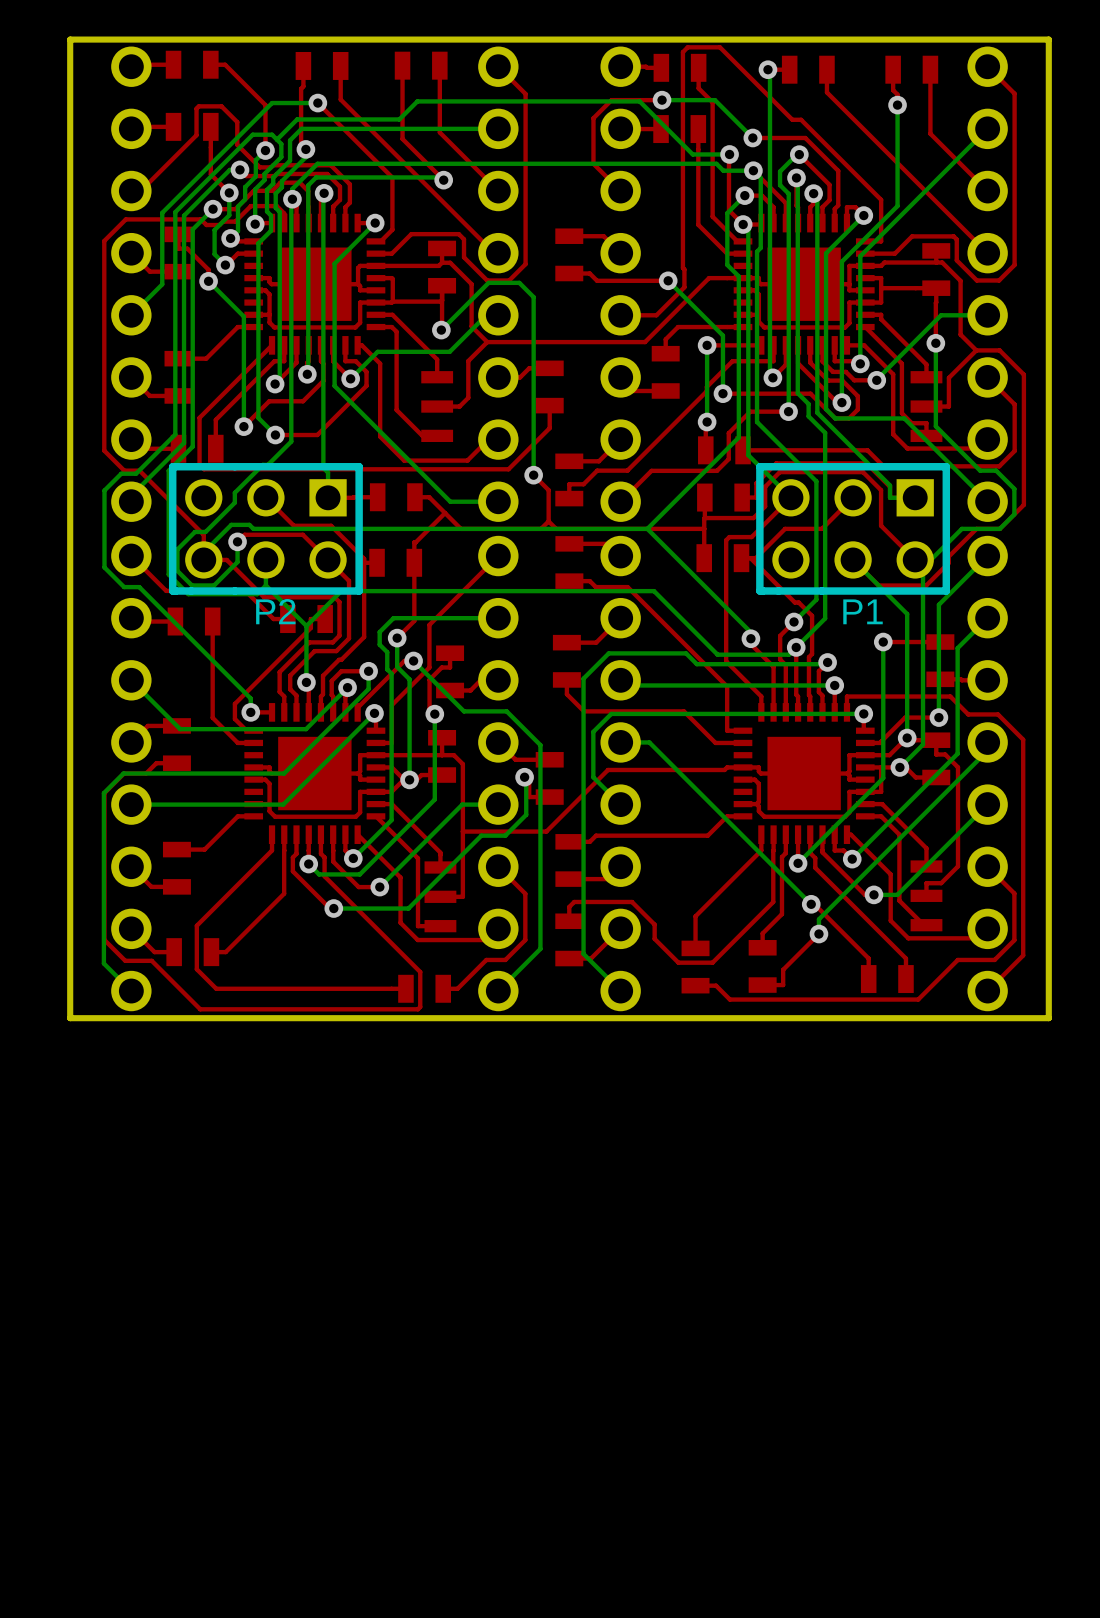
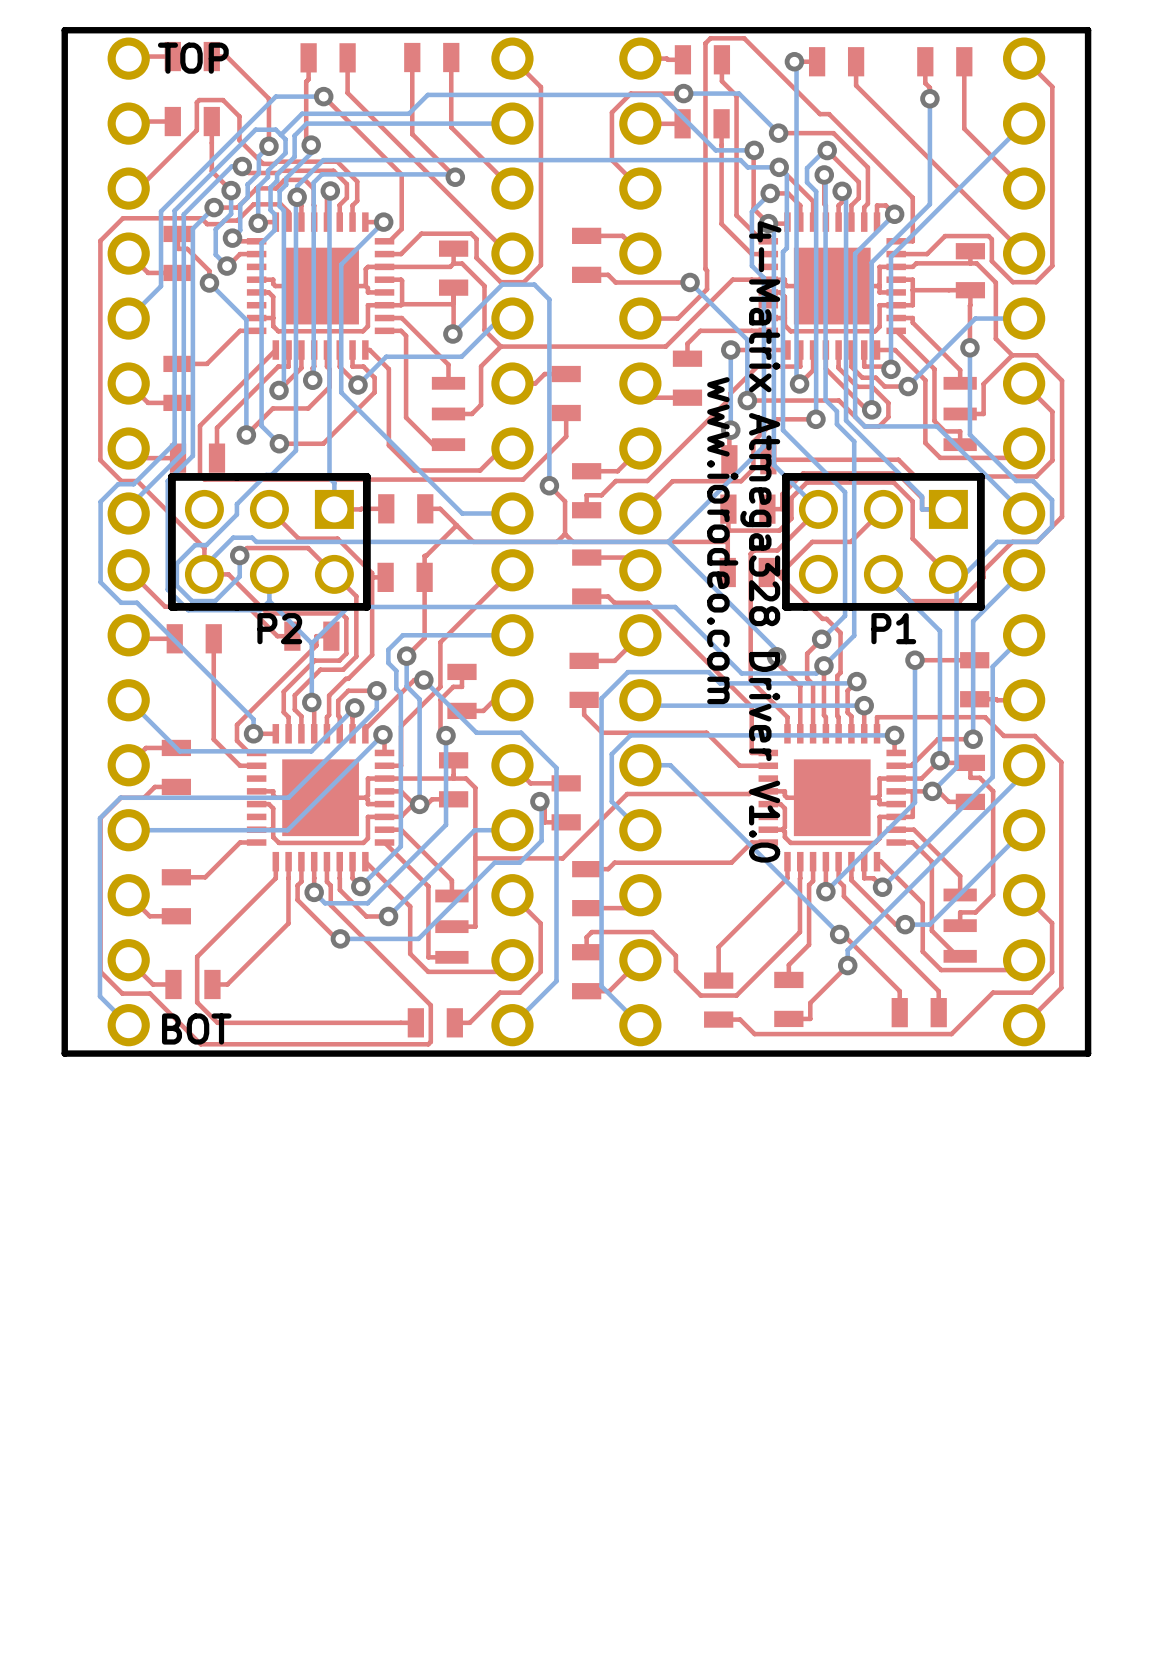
text: none -> TOP (193, 58)
text: none -> www.iorodeo.com (722, 540)
text: none -> 4-Matrix Atmega328 Driver V1.0 (760, 541)
text: none -> BOT (196, 1029)

